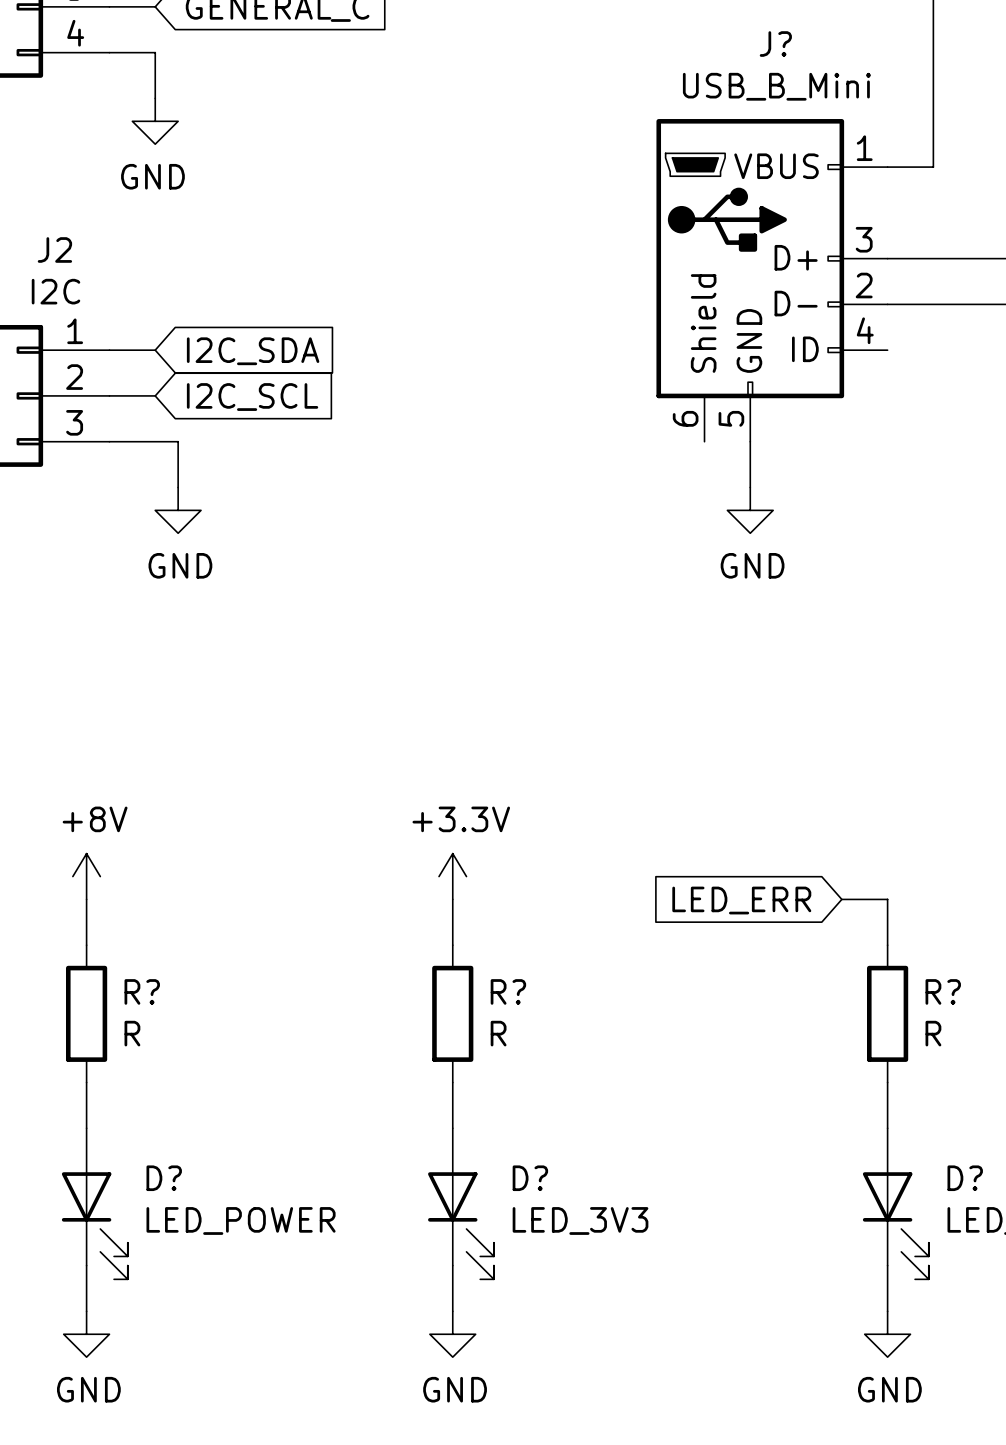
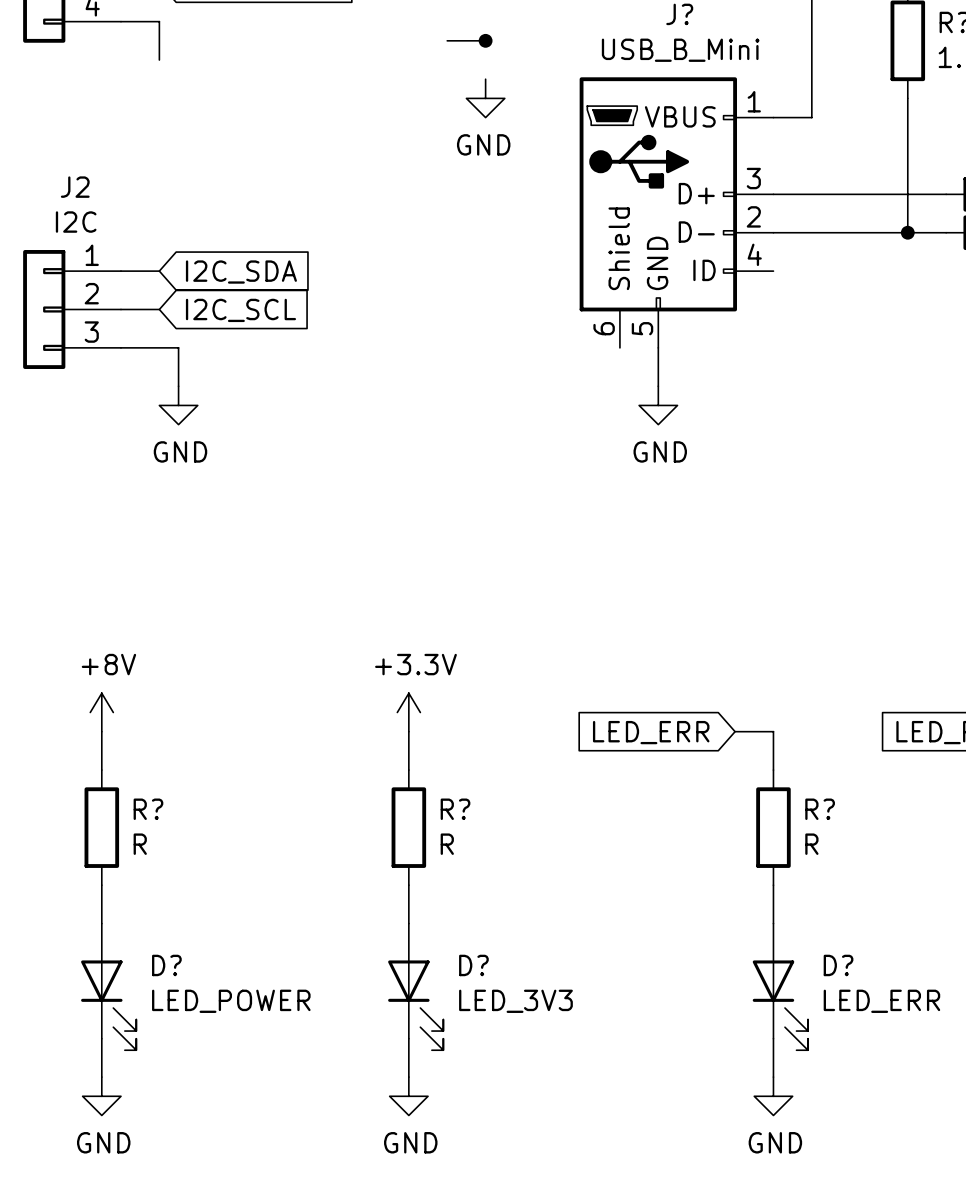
wire: none -> (447, 40) (485, 40)
junction: none -> (485, 40)
power symbol position: GND (155, 121) -> GND (485, 98)

